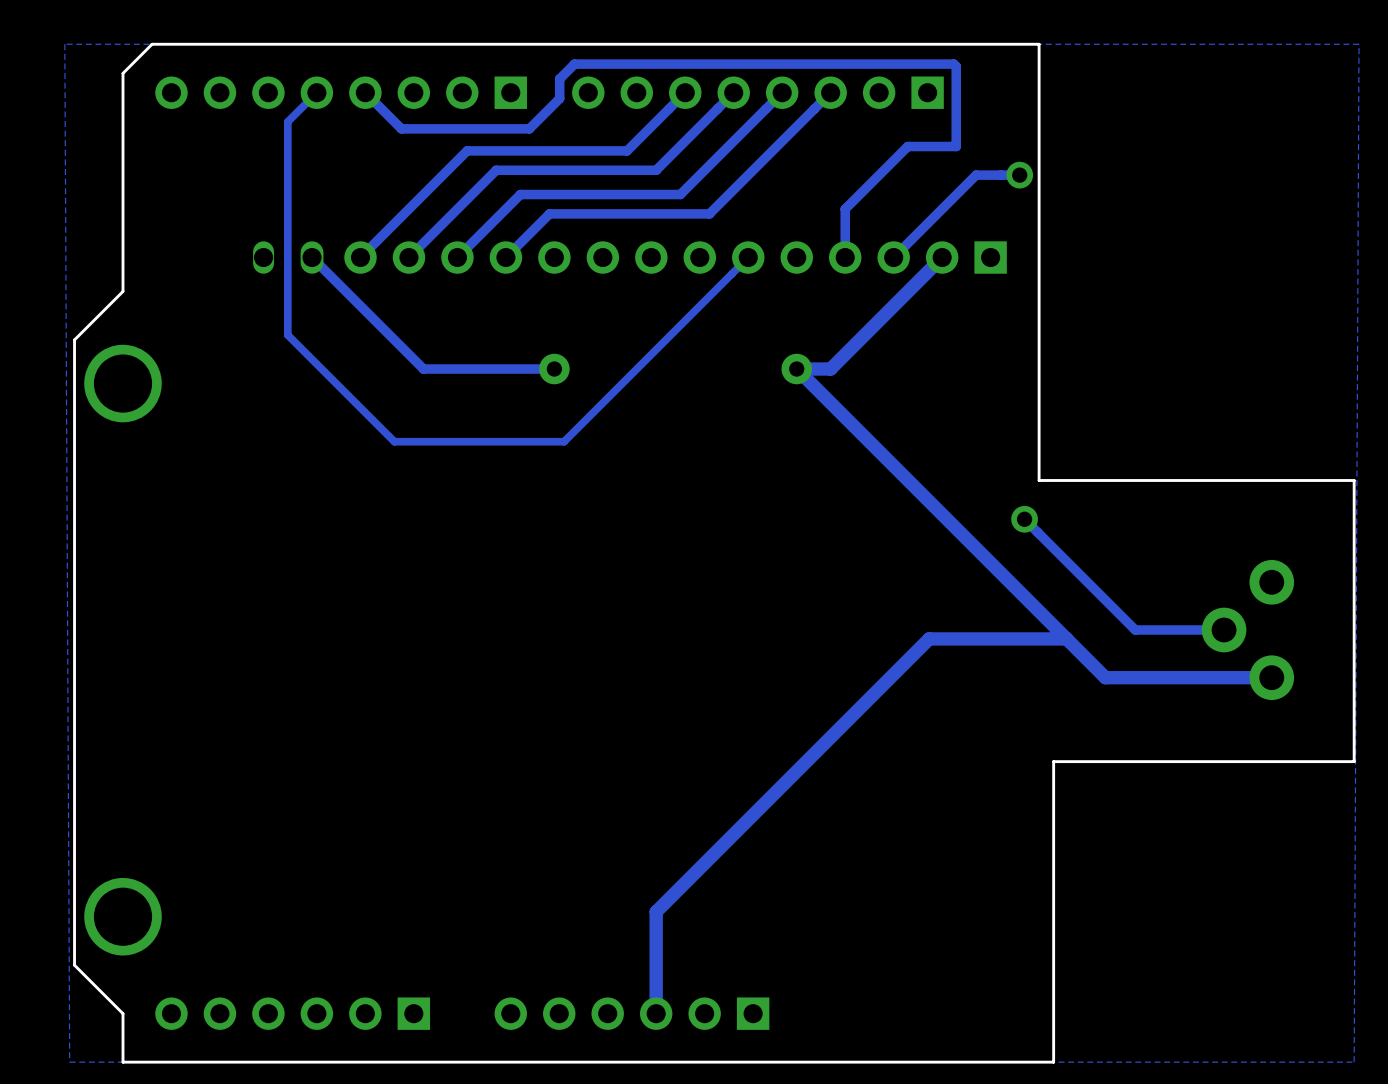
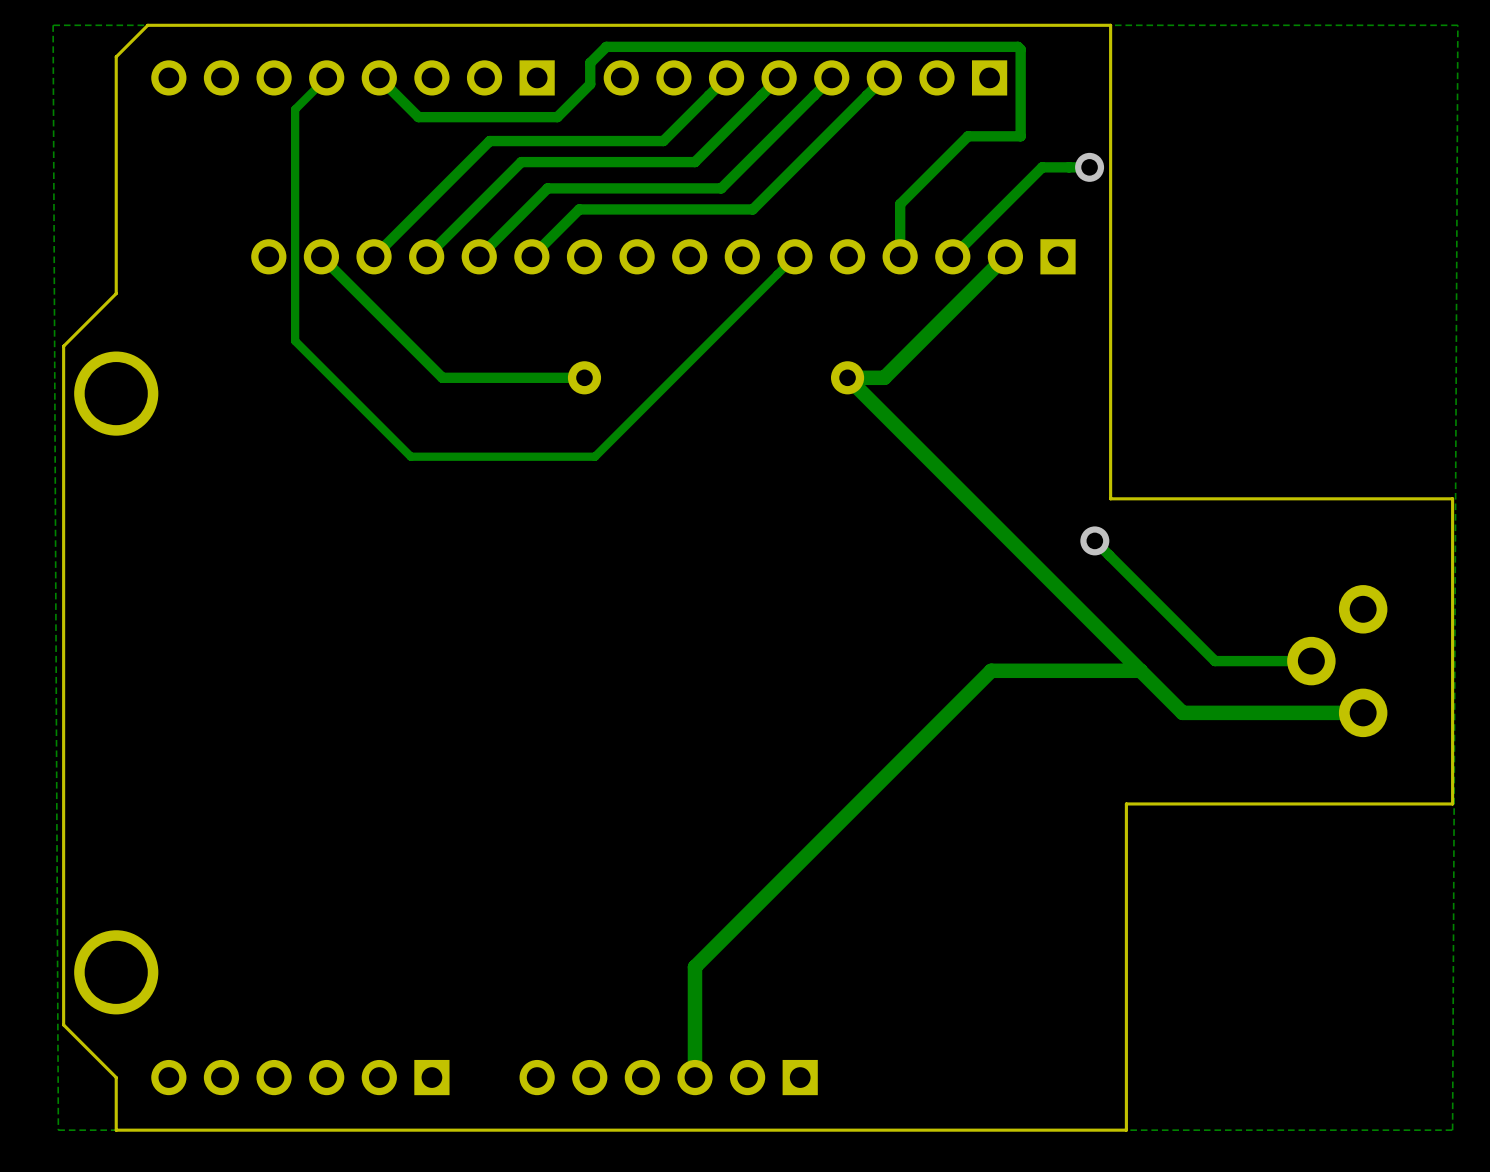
part footprint: [253, 241, 1007, 274] -> [251, 239, 1076, 275]

